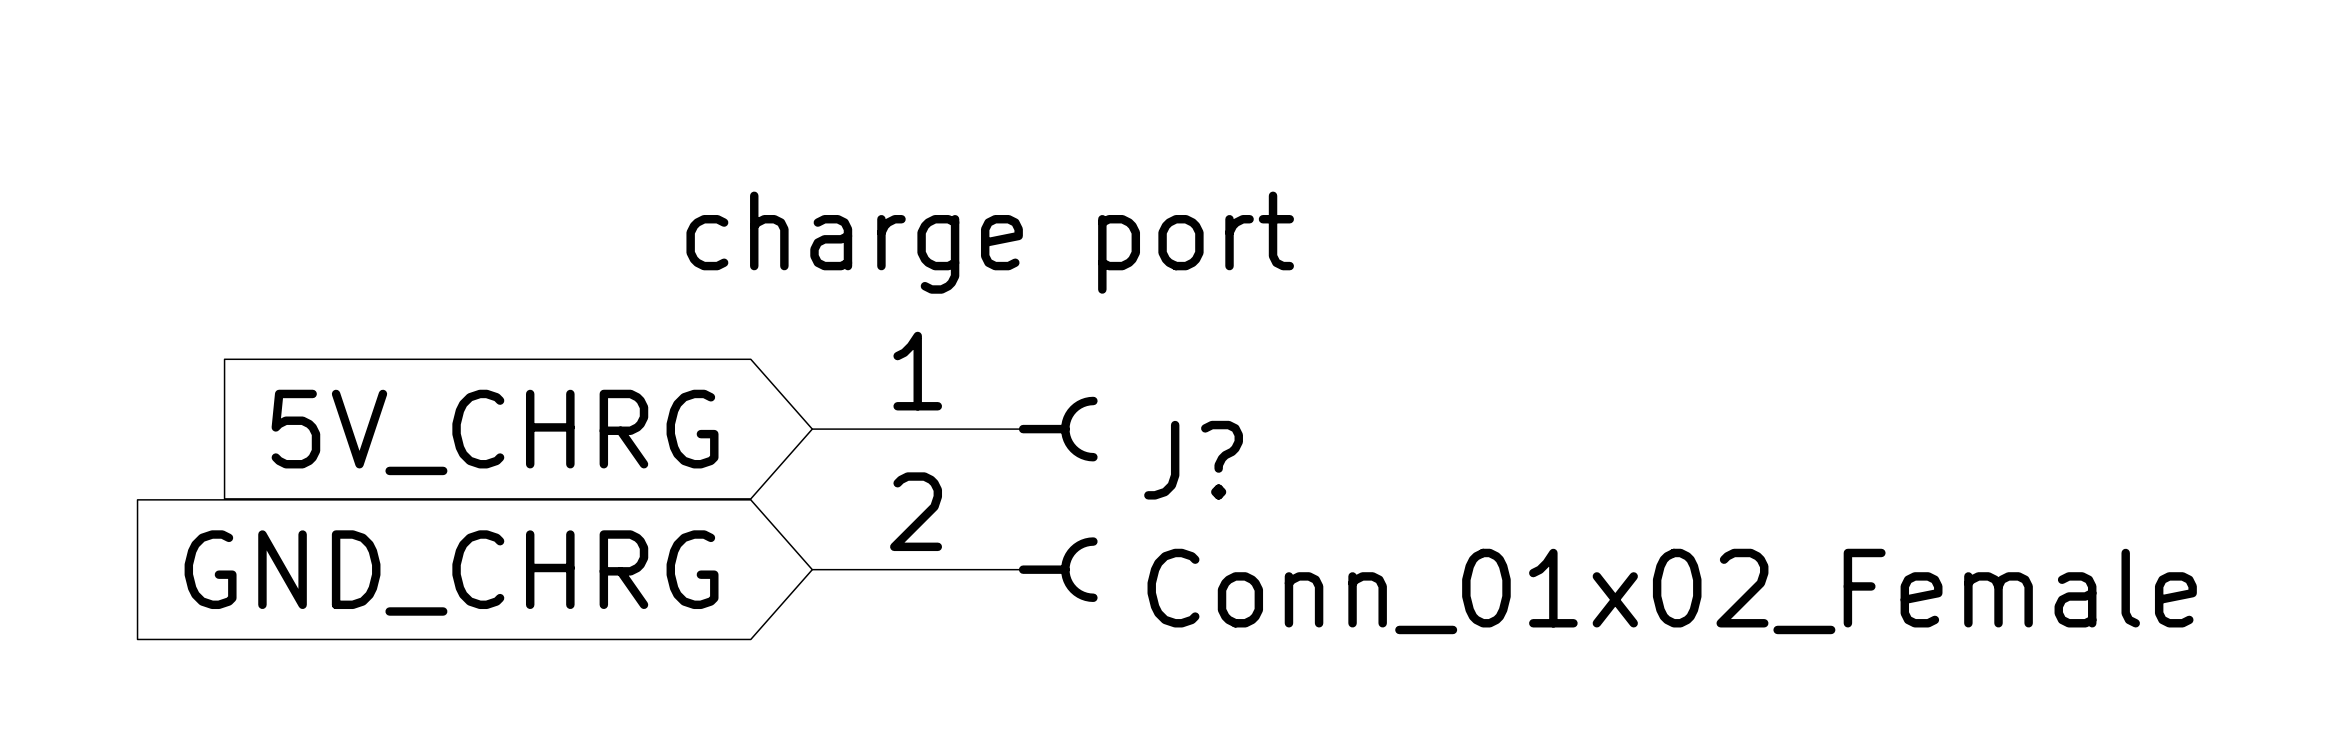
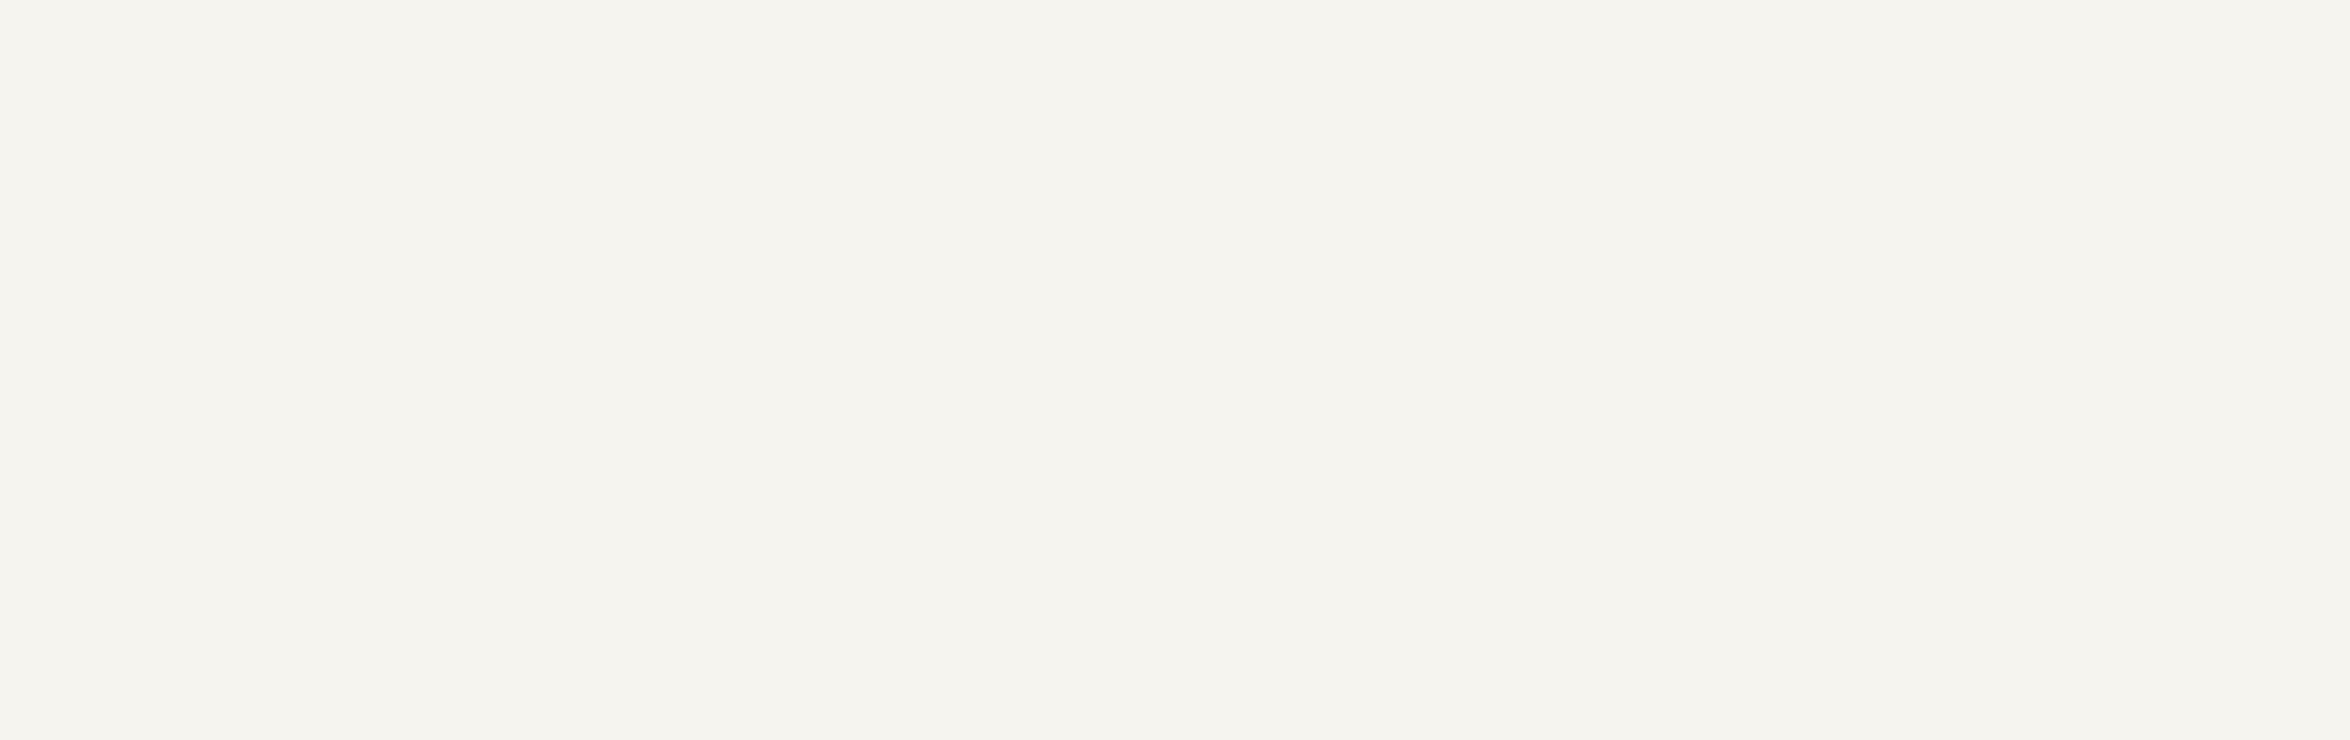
text: charge port (990, 242) -> none
global label: 5V_CHRG (495, 432) -> none
J?: Conn_01x02_Female (954, 499) -> none
global label: GND_CHRG (451, 573) -> none

